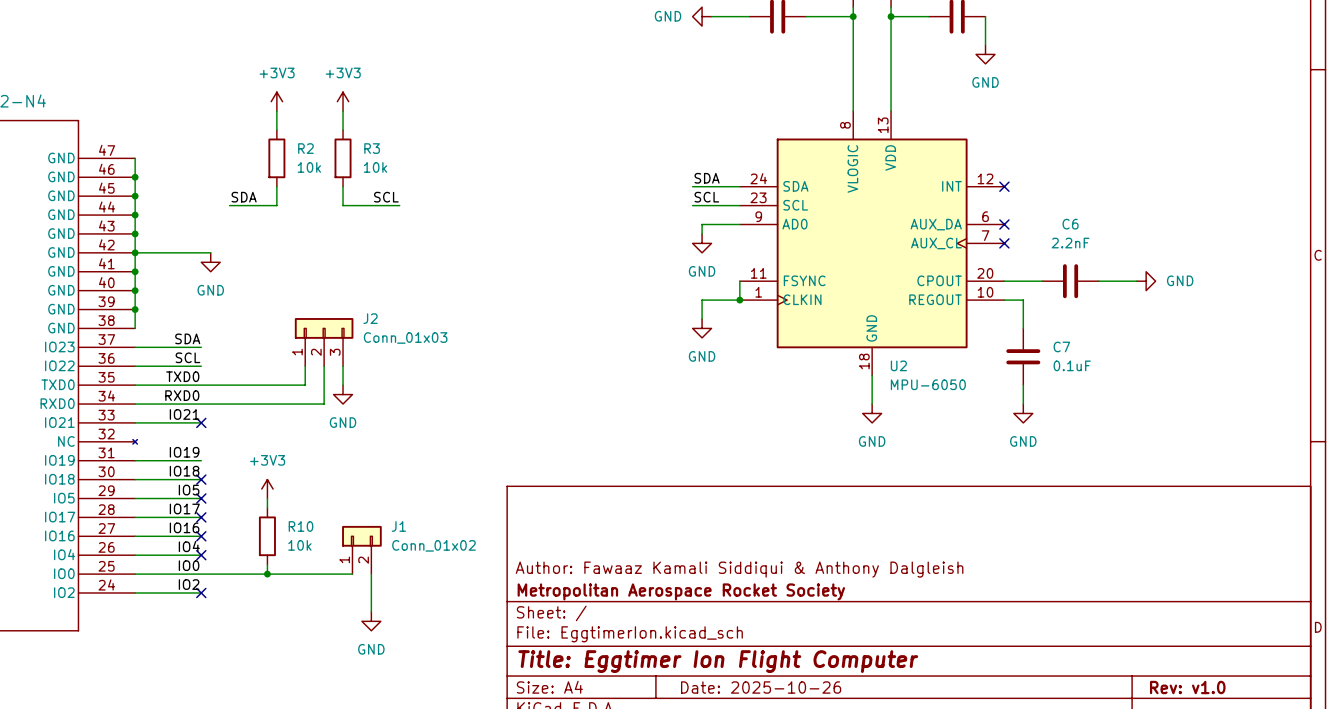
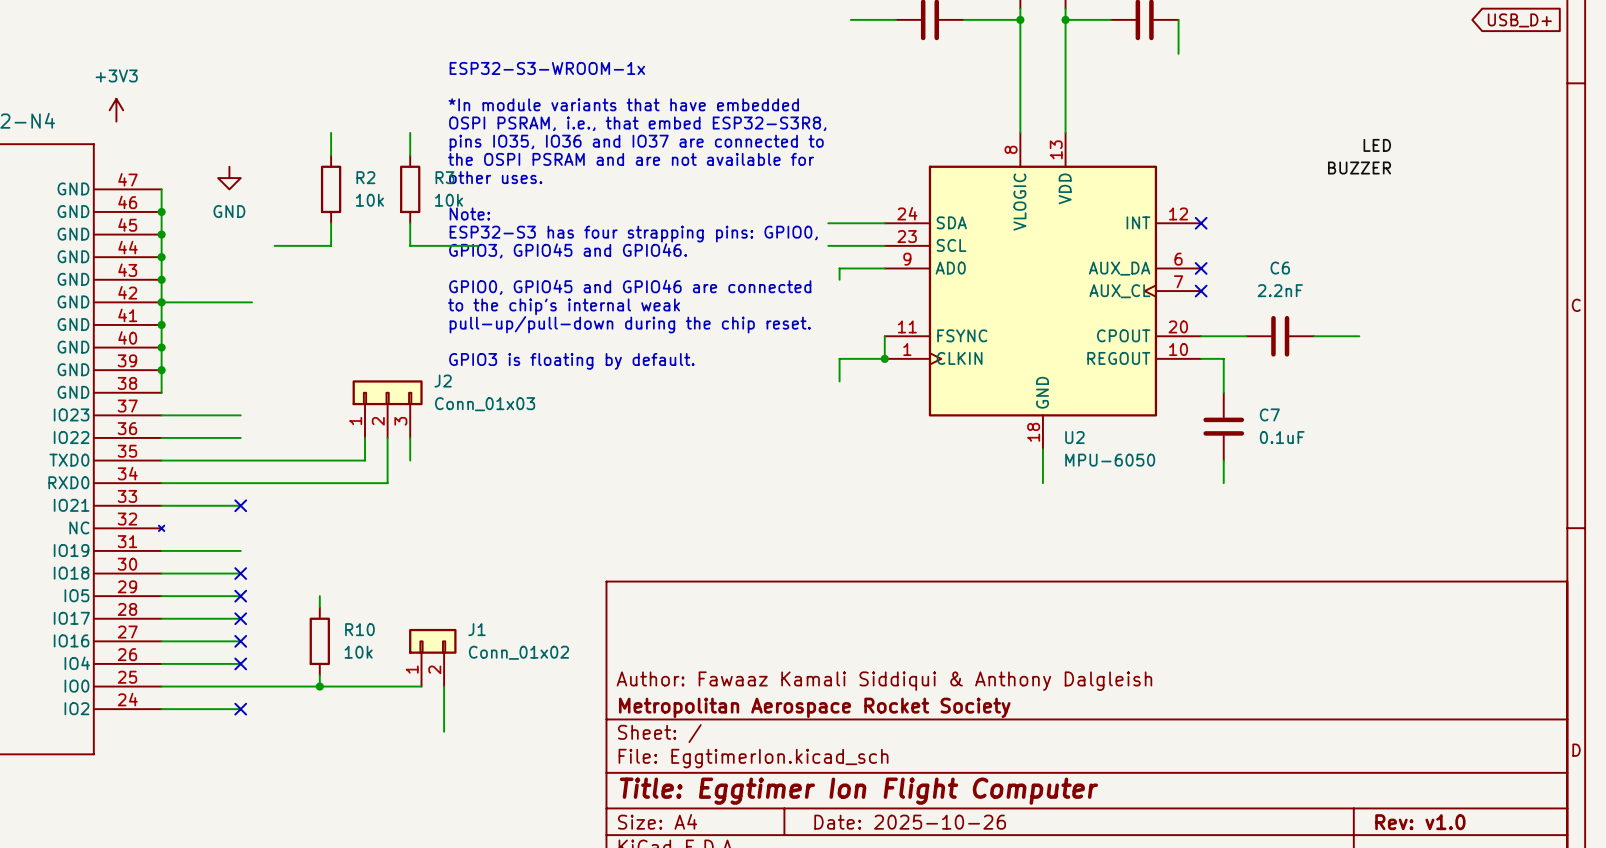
power symbol: GND (702, 16) -> none
global label: none -> USB_D+ (1519, 20)
power symbol: GND (985, 54) -> none
text: none -> ESP32-S3-WROOM-1x (547, 68)
text: none -> *In module variants that have embedded (623, 104)
power symbol: none -> +3V3 (116, 110)
power symbol: +3V3 (276, 101) -> none
power symbol: +3V3 (343, 101) -> none
text: none -> OSPI PSRAM, i.e., that embed ESP32-S3R8, (637, 123)
text: none -> pins IO35, IO36 and IO37 are connected to (636, 143)
label: none -> LED (1377, 145)
text: none -> the OSPI PSRAM and are not available for (631, 159)
label: none -> BUZZER (1359, 167)
text: none -> other uses. (495, 177)
text: none -> Note: (469, 213)
label: SDA (707, 178) -> none
text: none -> ESP32-S3 has four strapping pins: GPIO0, (633, 234)
label: SDA (244, 197) -> none
label: SCL (386, 197) -> none
label: SCL (706, 197) -> none
text: none -> GPIO3, GPIO45 and GPIO46. (568, 250)
text: none -> GPIO0, GPIO45 and GPIO46 are connected (630, 287)
power symbol: GND (702, 243) -> none
text: none -> to the chip's internal weak (564, 306)
power symbol position: GND (210, 262) -> GND (229, 178)
text: none -> pull-up/pull-down during the chip reset. (630, 324)
power symbol: GND (1146, 281) -> none
text: none -> GPIO3 is floating by default. (571, 361)
power symbol: GND (702, 328) -> none
label: SDA (187, 338) -> none
label: SCL (187, 357) -> none
label: TXD0 (182, 376) -> none
power symbol: GND (343, 394) -> none
label: RXD0 (182, 395) -> none
power symbol: GND (872, 413) -> none
power symbol: GND (1023, 413) -> none
label: IO21 (184, 414) -> none
label: IO19 (184, 452) -> none
label: IO18 (184, 471) -> none
power symbol: +3V3 (267, 489) -> none
label: IO5 (189, 490) -> none
label: IO17 (184, 508) -> none
label: IO16 (184, 527) -> none
label: IO4 (189, 546) -> none
label: IO0 (189, 565) -> none
label: IO2 (189, 584) -> none
power symbol: GND (371, 621) -> none

